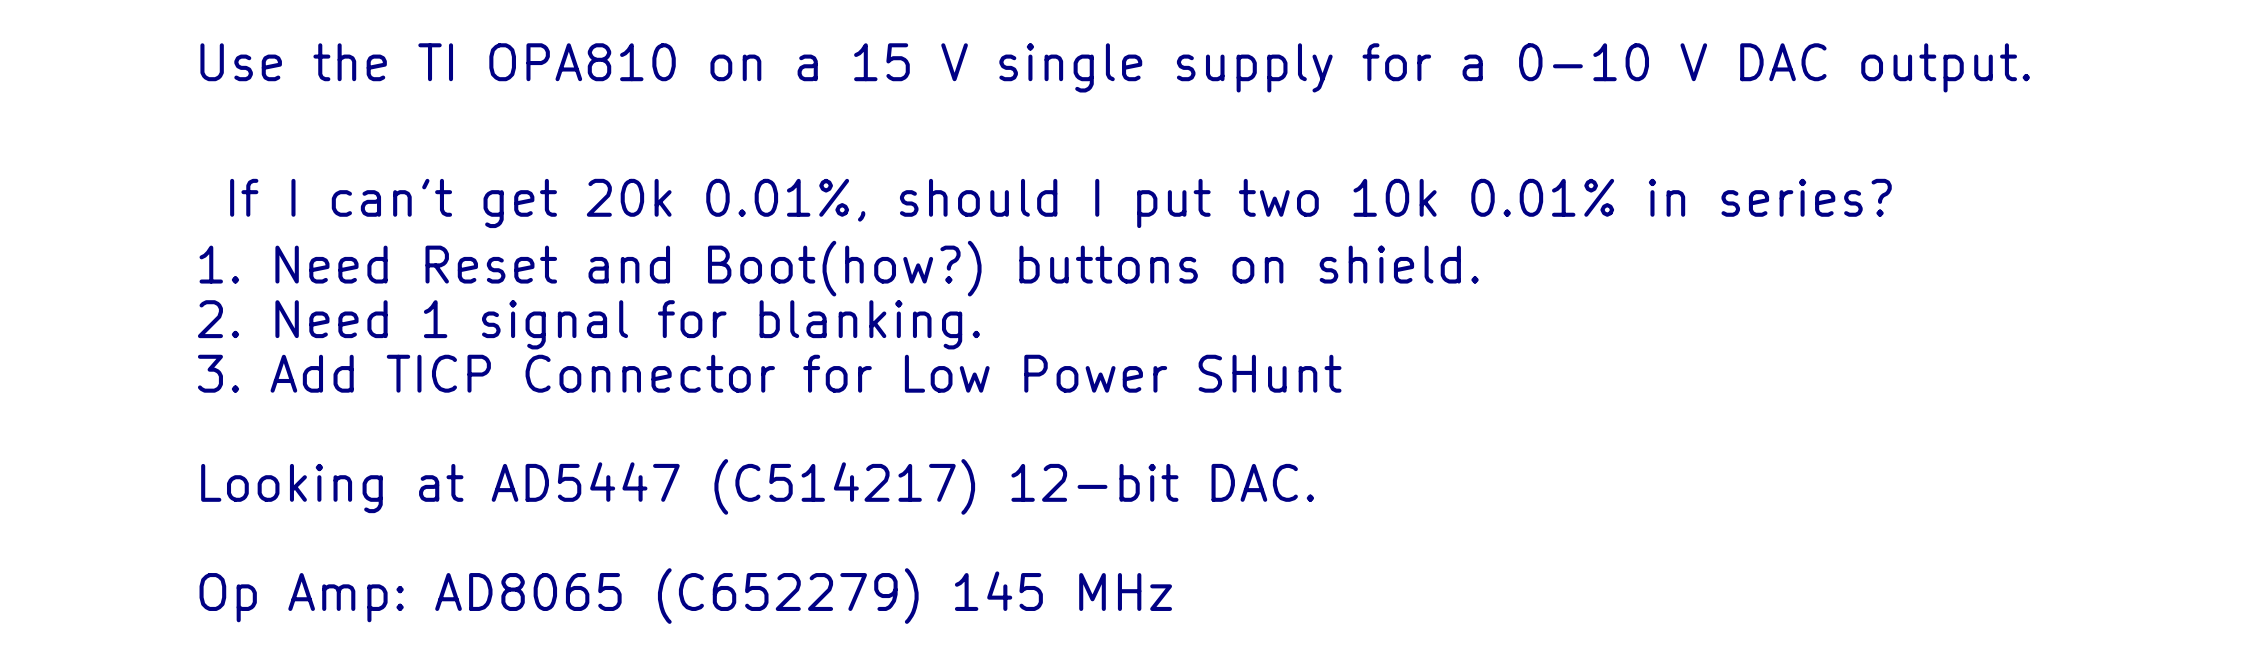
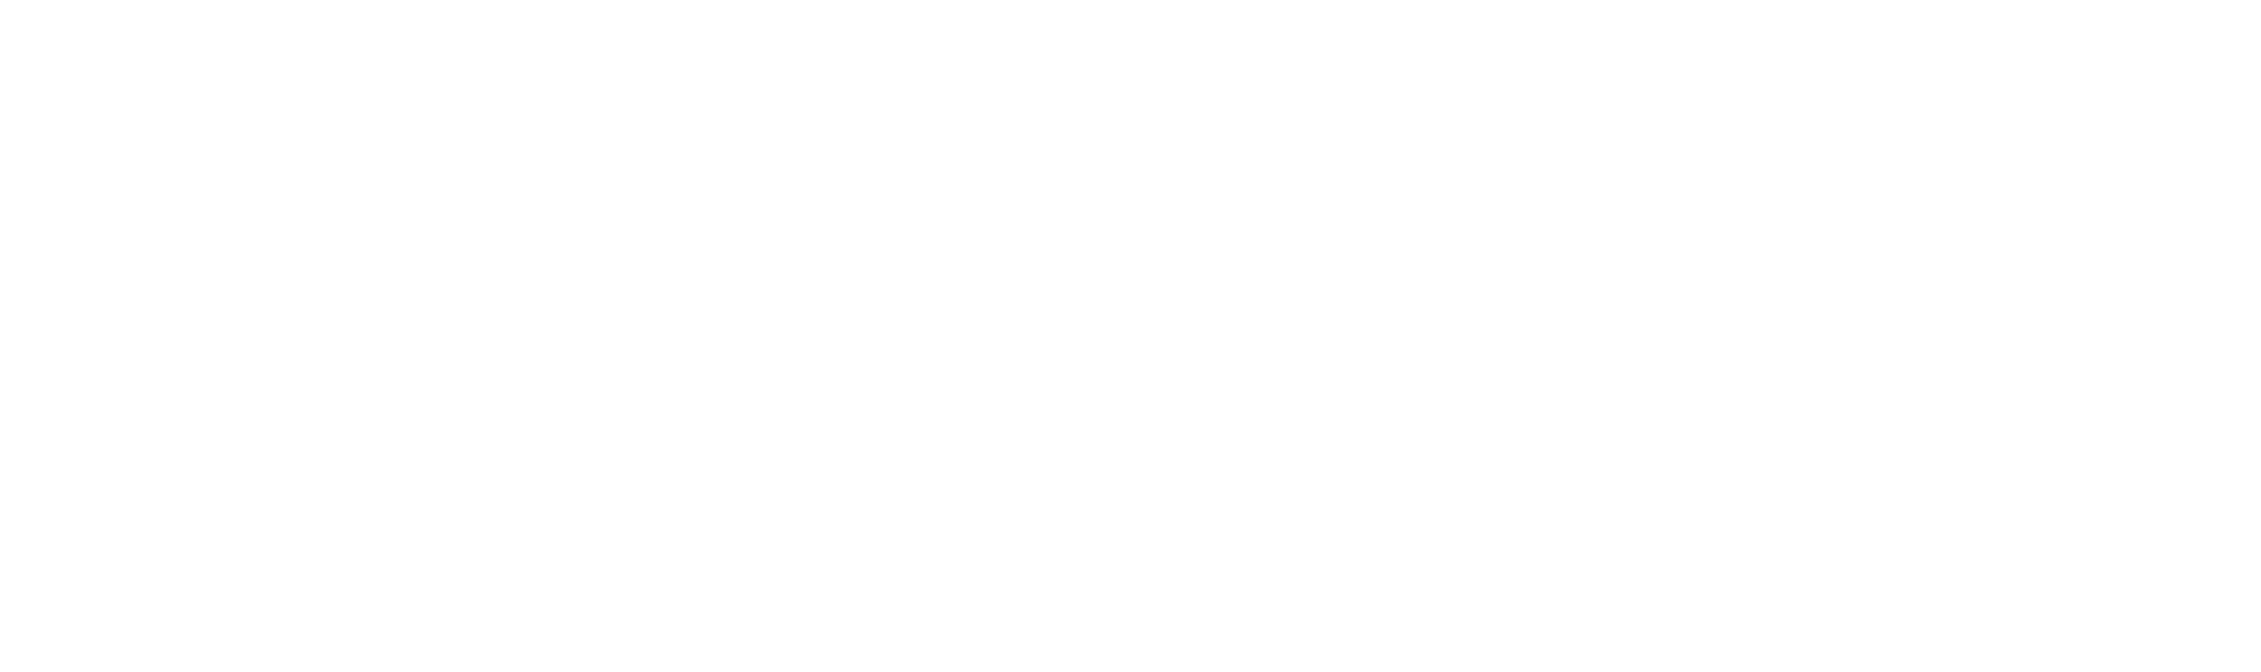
text: Use the TI OPA810 on a 15 V single supply for a 0-10 V DAC output. (1115, 67) -> none
text: If I can't get 20k 0.01%, should I put two 10k 0.01% in series? (1060, 203) -> none
text: 1. Need Reset and Boot(how?) buttons on shield. (839, 268) -> none
text: 2. Need 1 signal for blanking. (588, 324) -> none
text: 3. Add TICP Connector for Low Power SHunt (769, 373) -> none
text: Looking at AD5447 (C514217) 12-bit DAC. (757, 486) -> none
text: Op Amp: AD8065 (C652279) 145 MHz (685, 596) -> none

